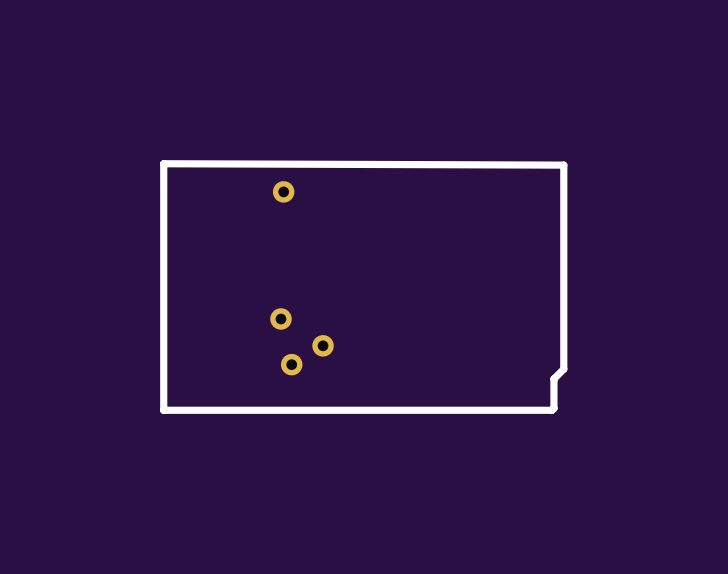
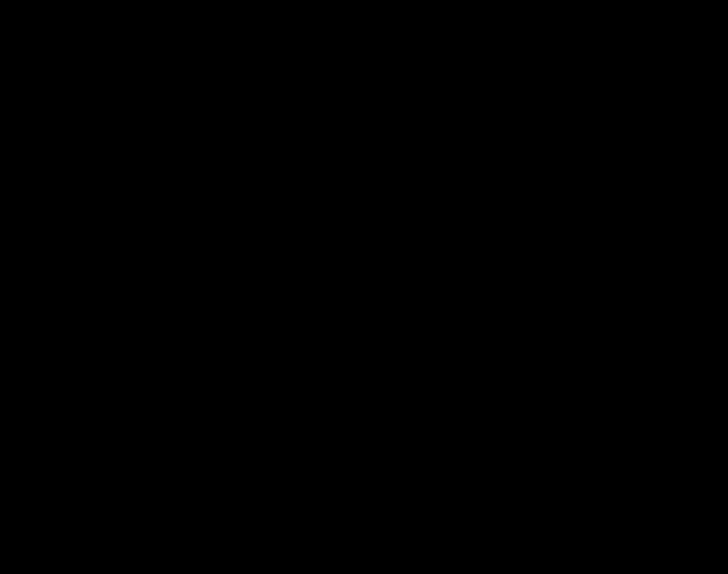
part: (363, 287) -> none

